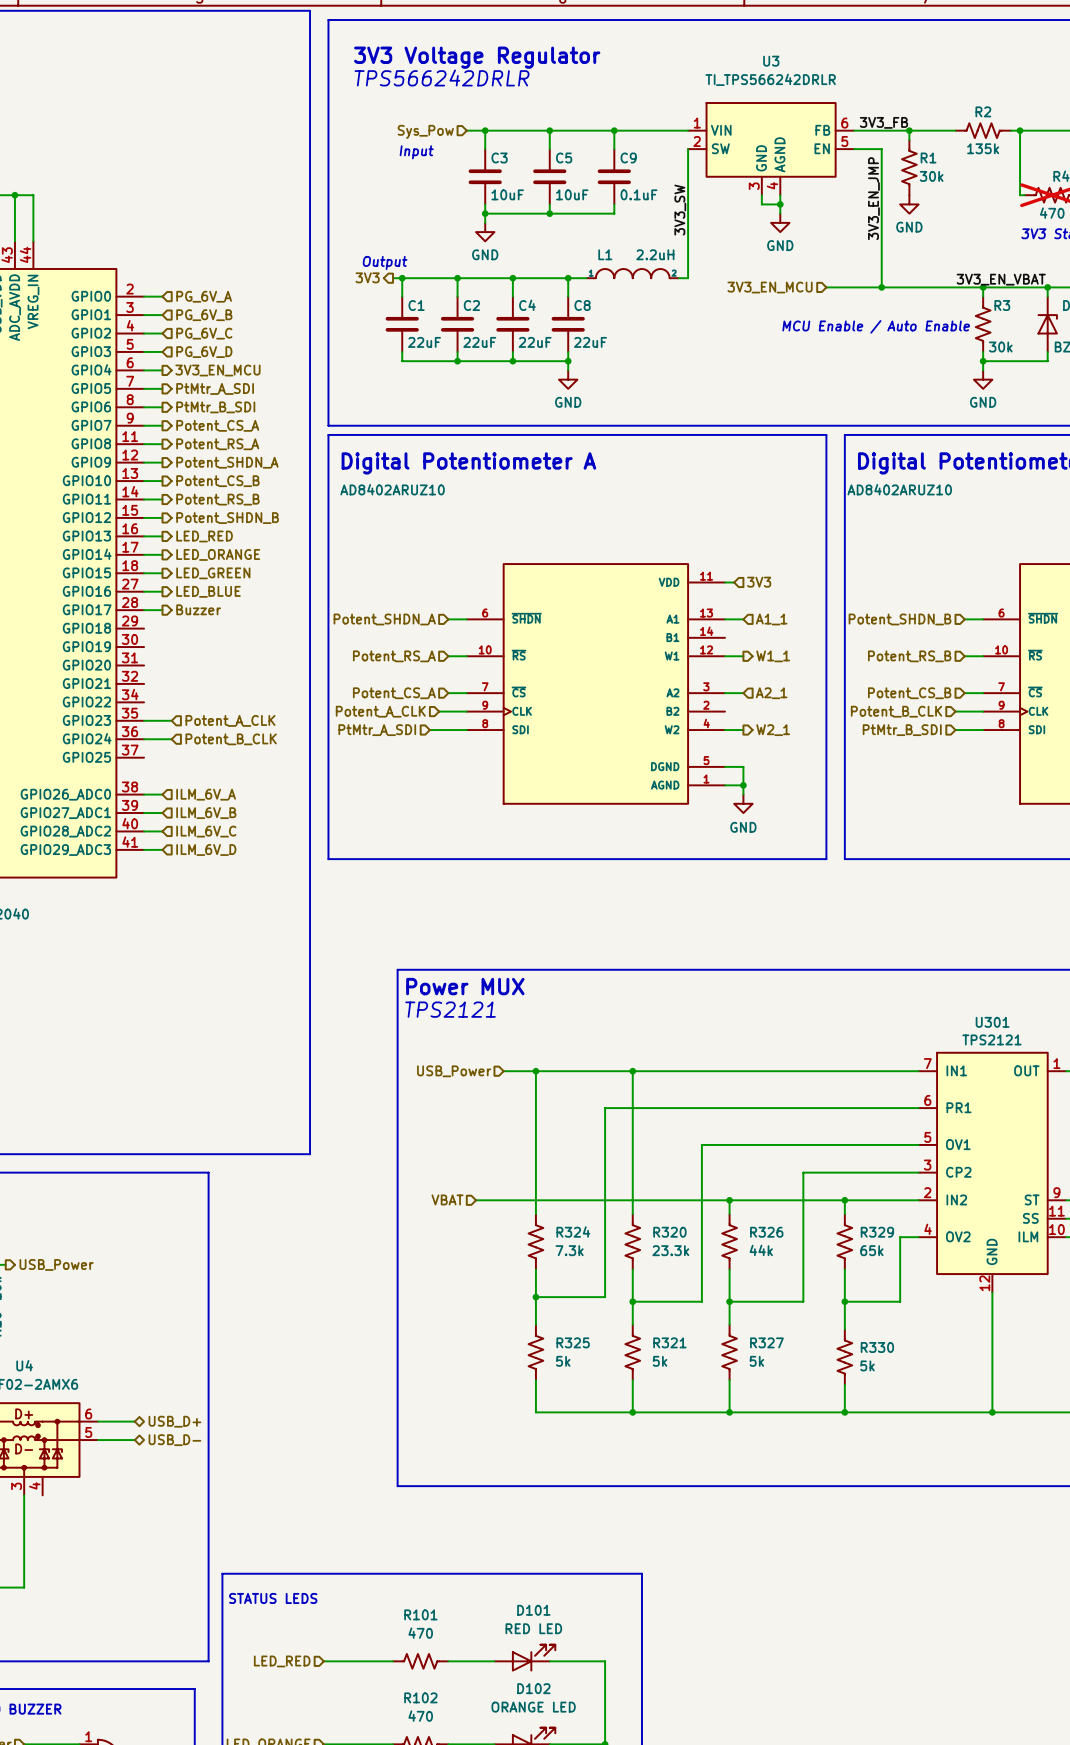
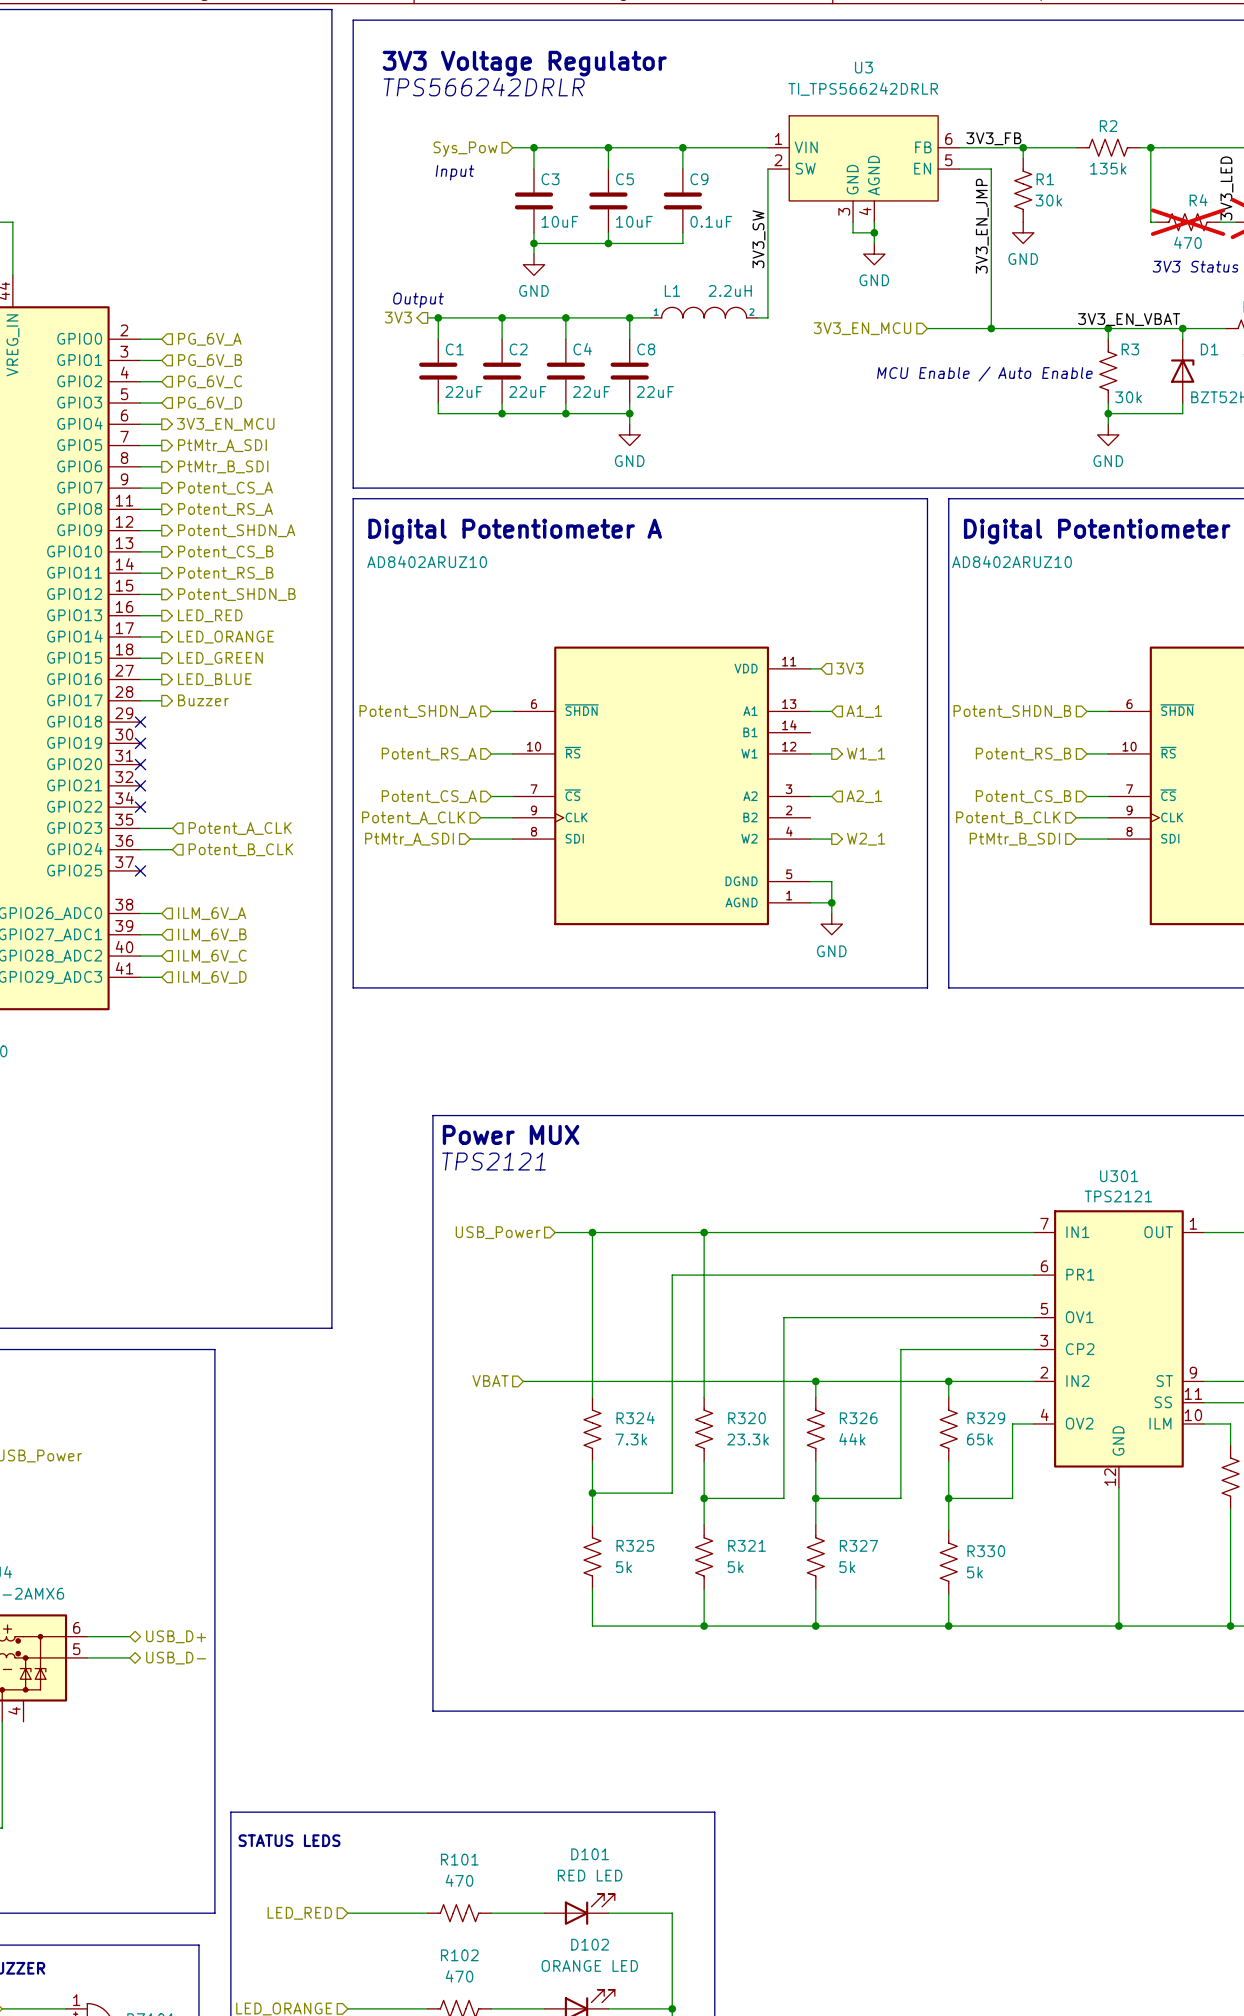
no-connect mark: none -> (140, 722)
no-connect mark: none -> (140, 743)
no-connect mark: none -> (140, 764)
no-connect mark: none -> (140, 785)
no-connect mark: none -> (140, 807)
no-connect mark: none -> (140, 870)

